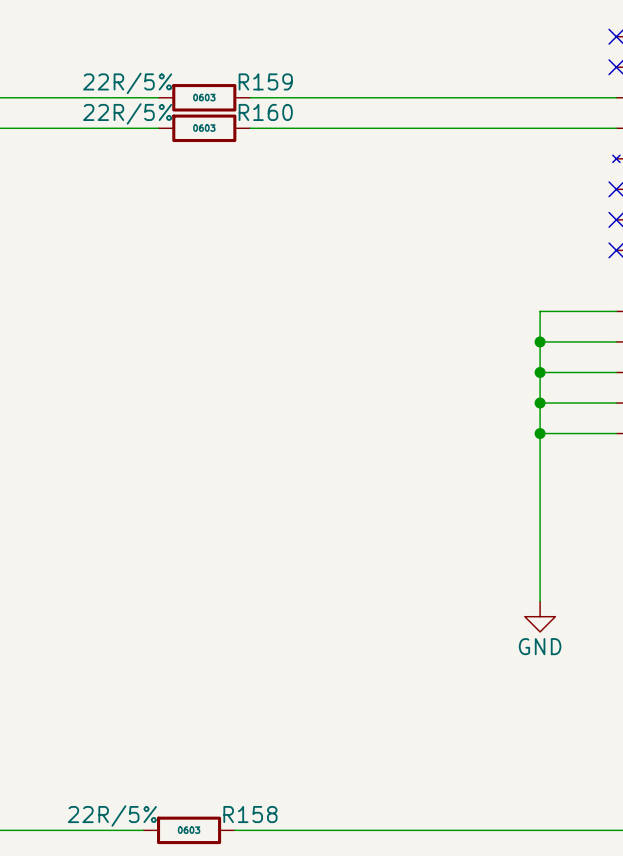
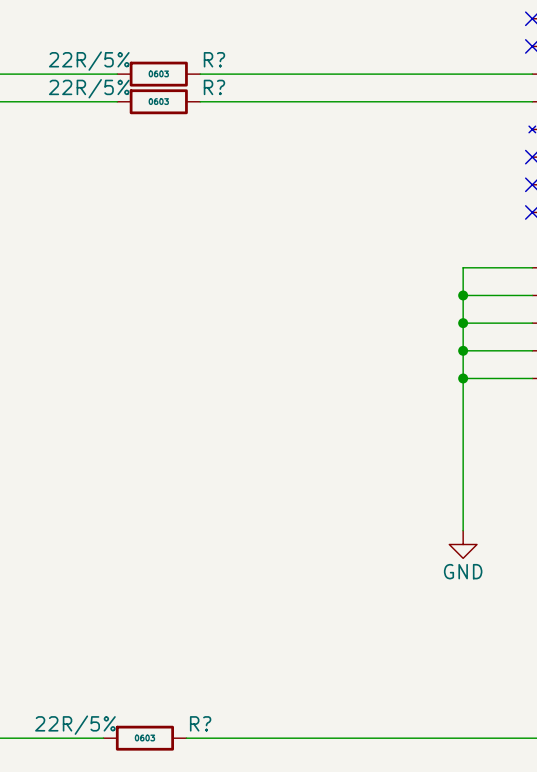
R159 name: R159 (265, 81) -> R? (214, 59)
R160 name: R160 (265, 112) -> R? (214, 87)
R158 name: R158 (250, 814) -> R? (200, 723)

